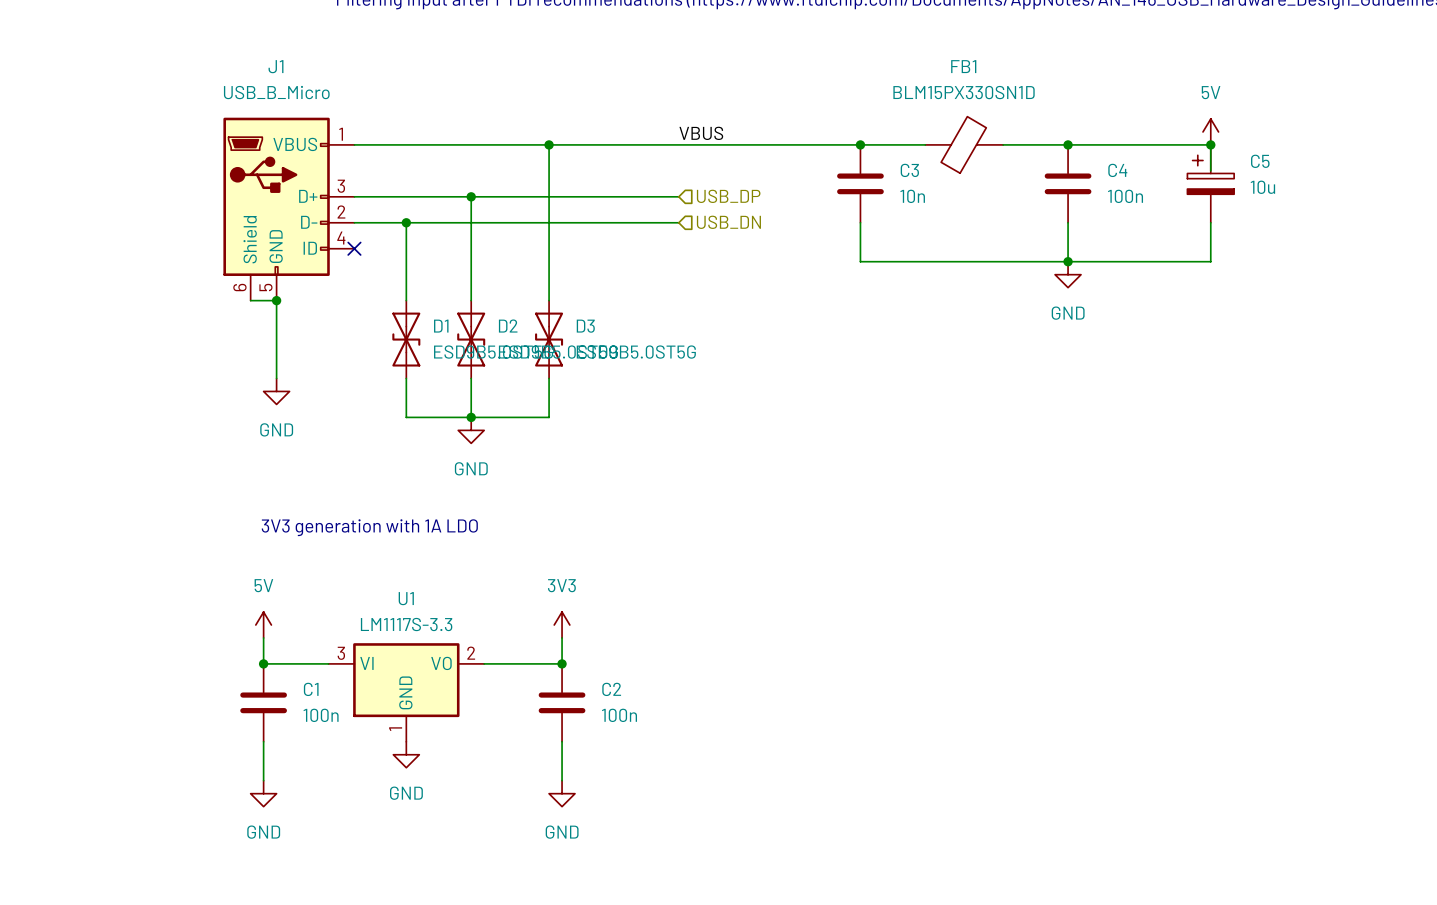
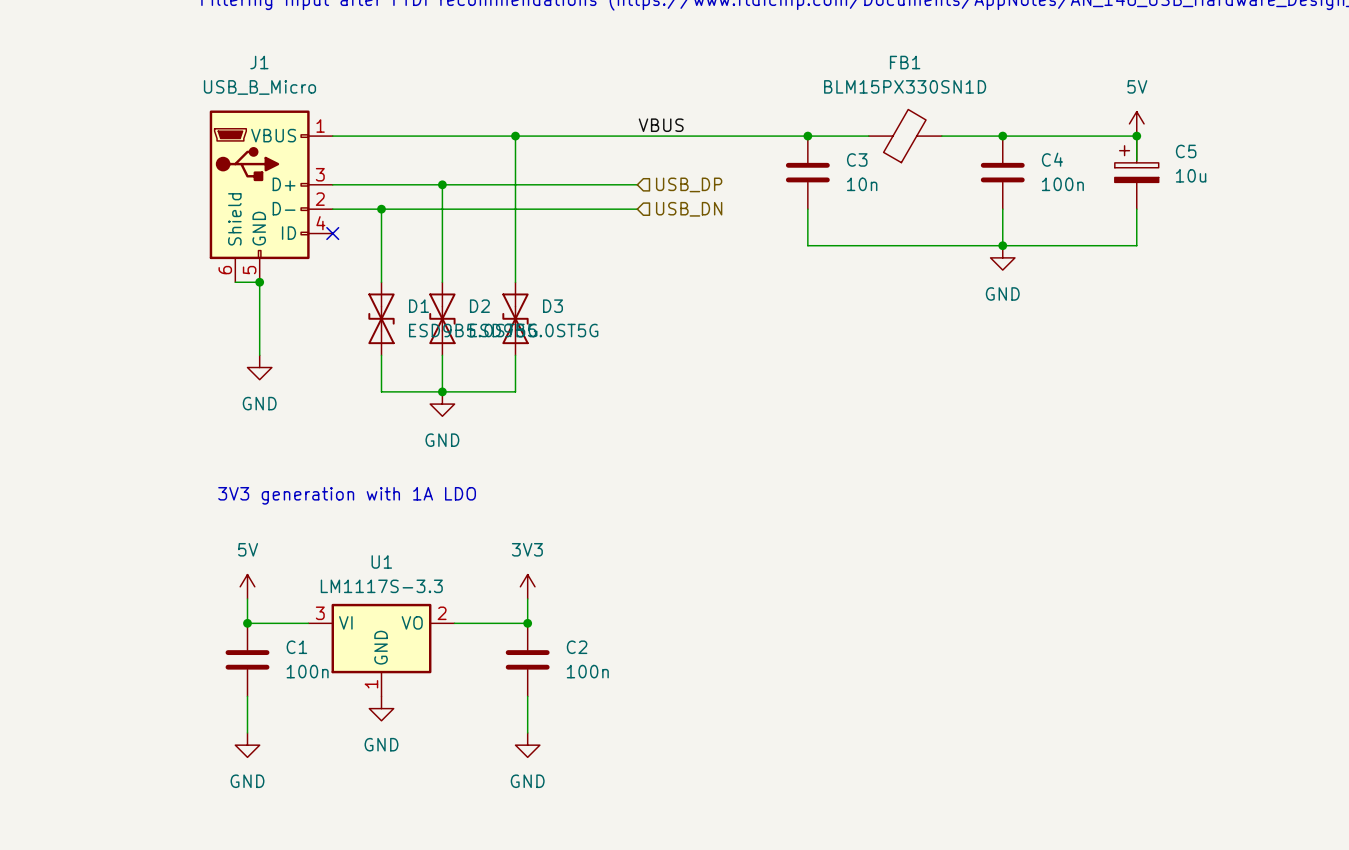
D3 value: ESD9B5.0ST5G (636, 352) -> none

